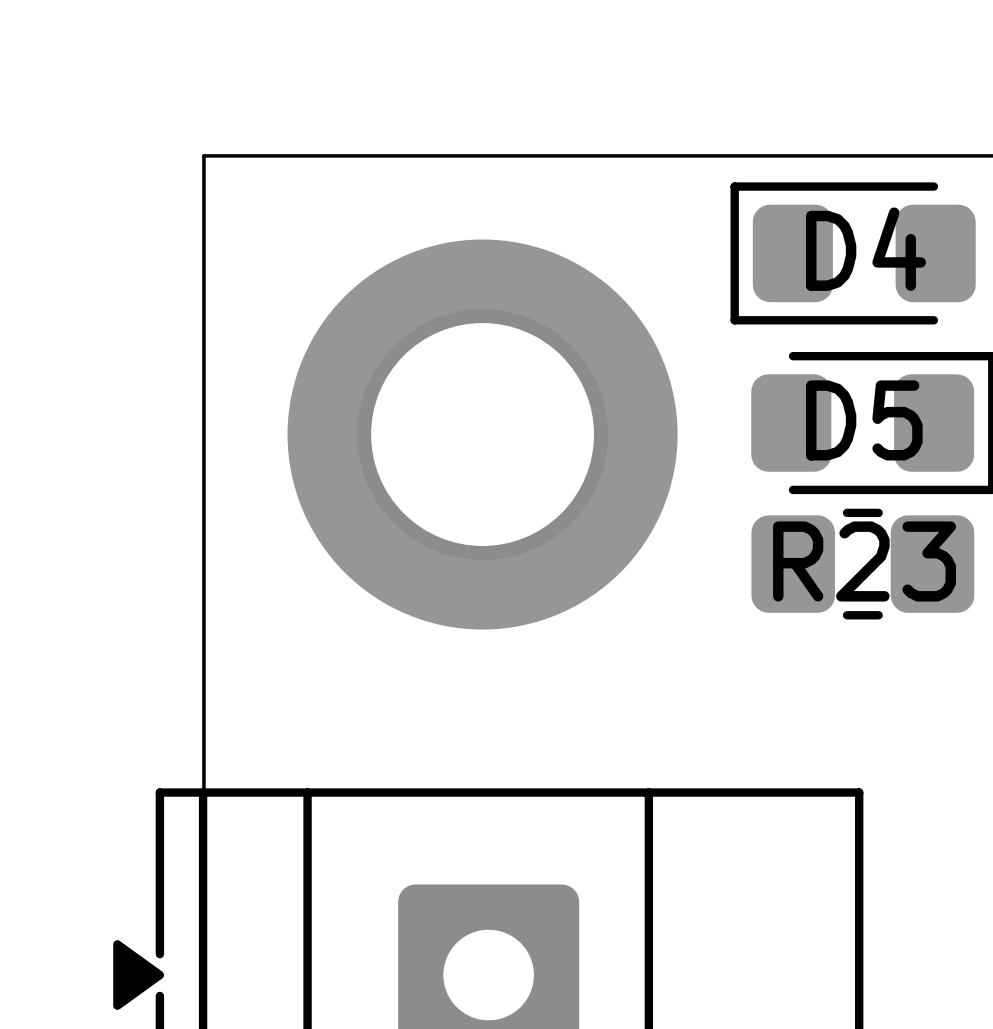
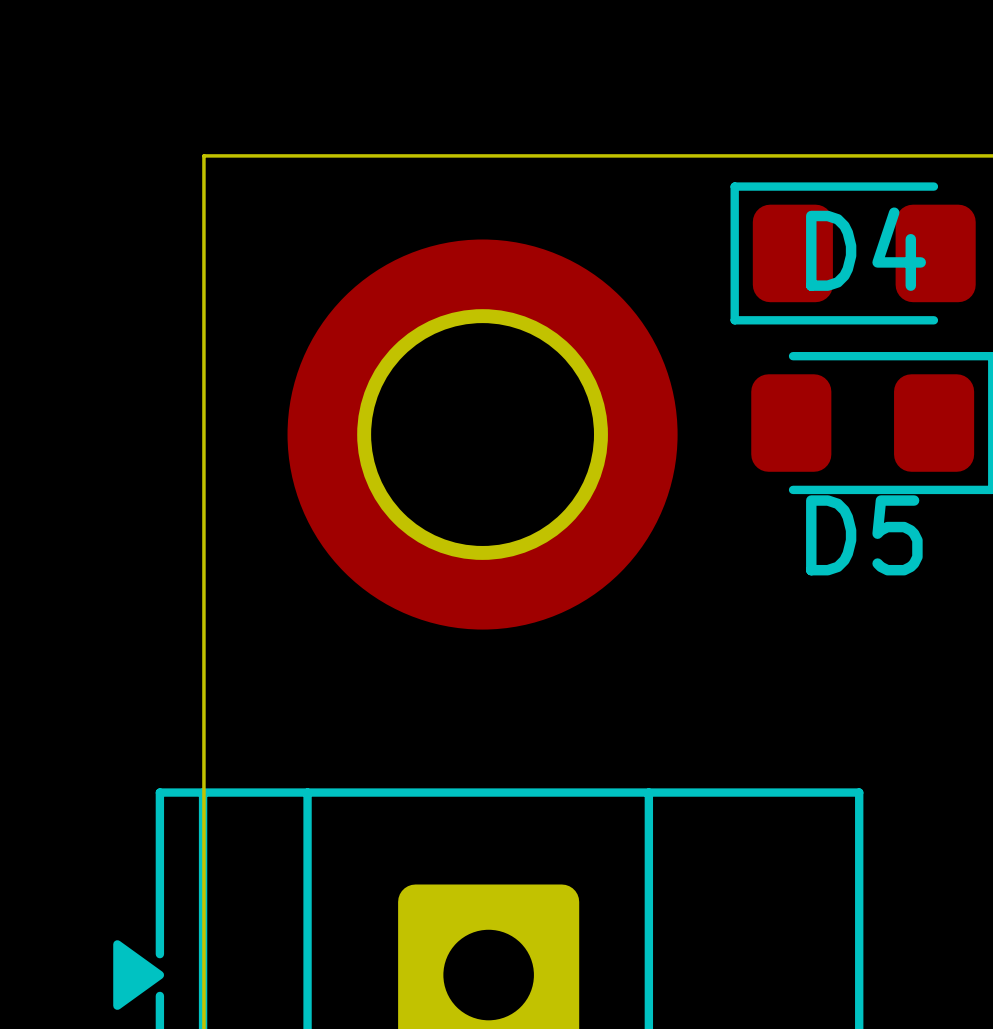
D5 name position: D5 (864, 420) -> D5 (864, 535)
R23: (862, 564) -> none

